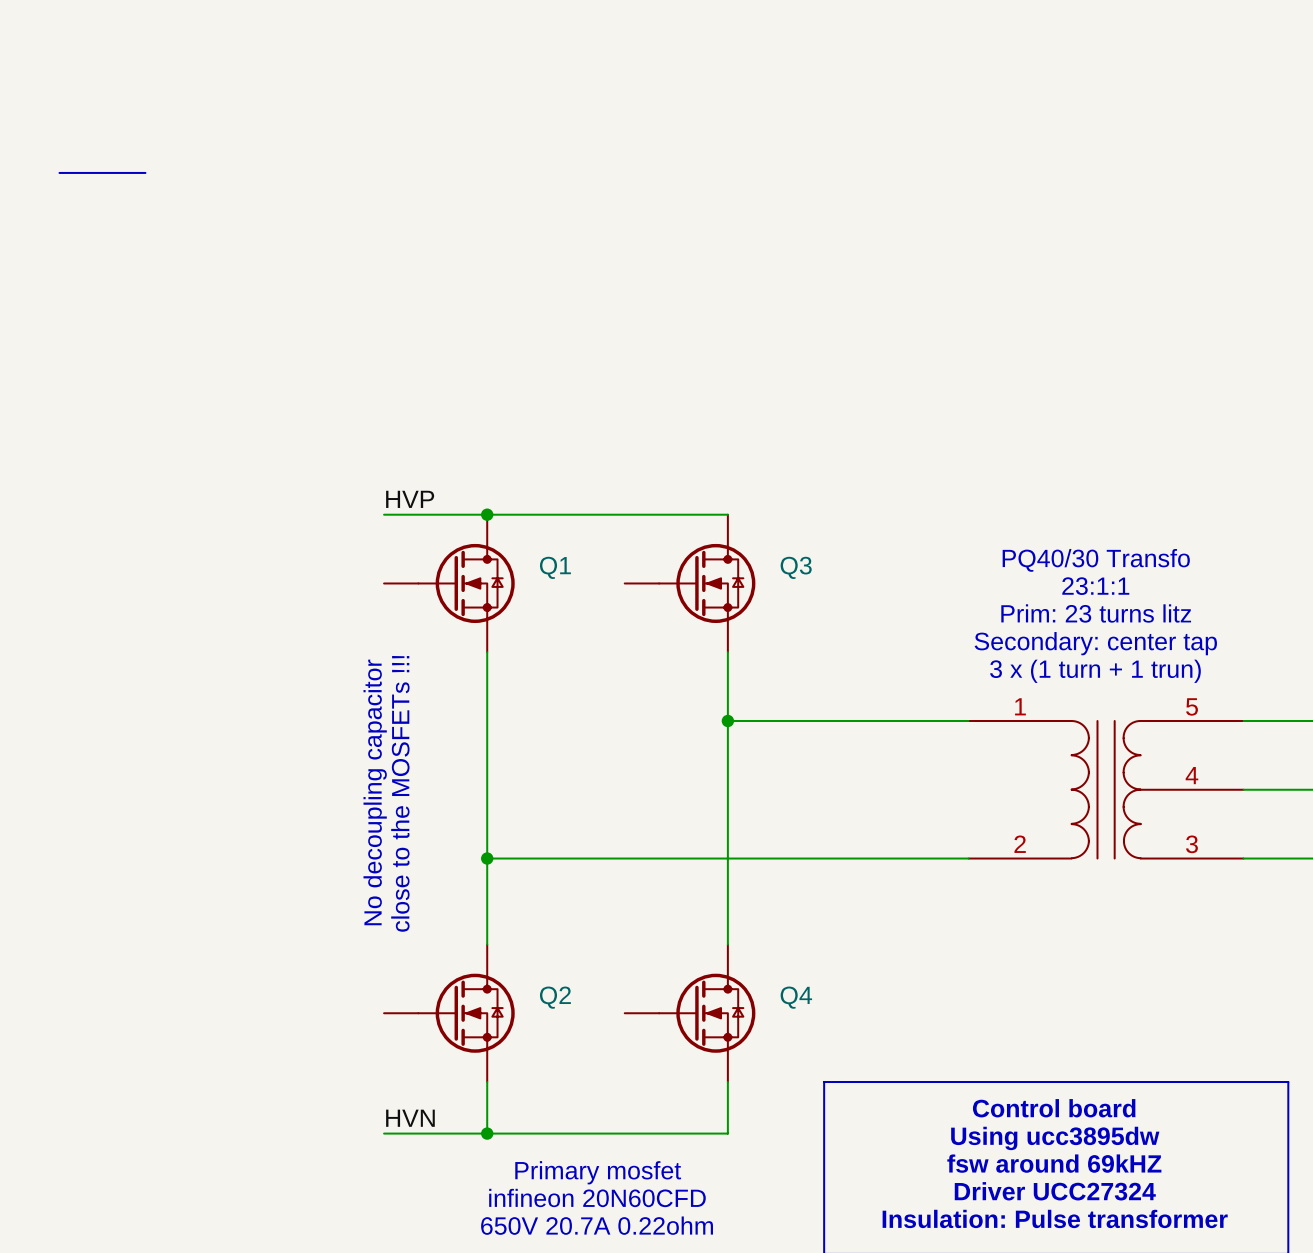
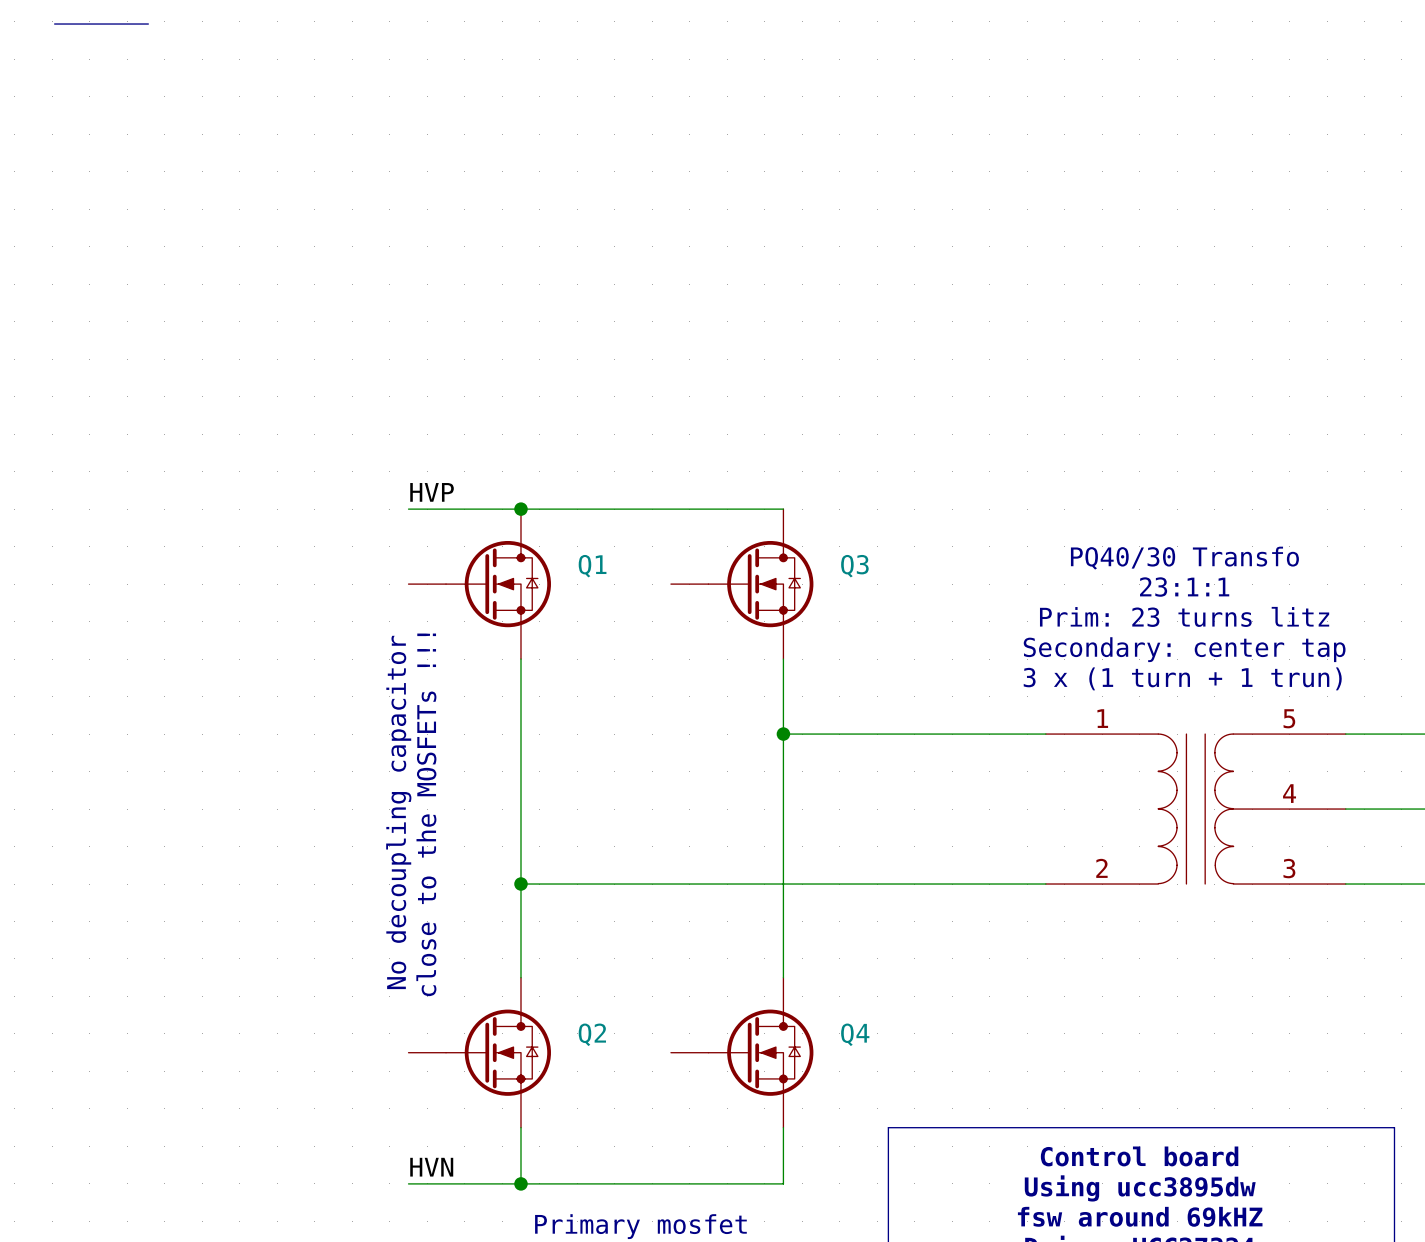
bus: (59, 172) (145, 172) -> (54, 24) (148, 24)

